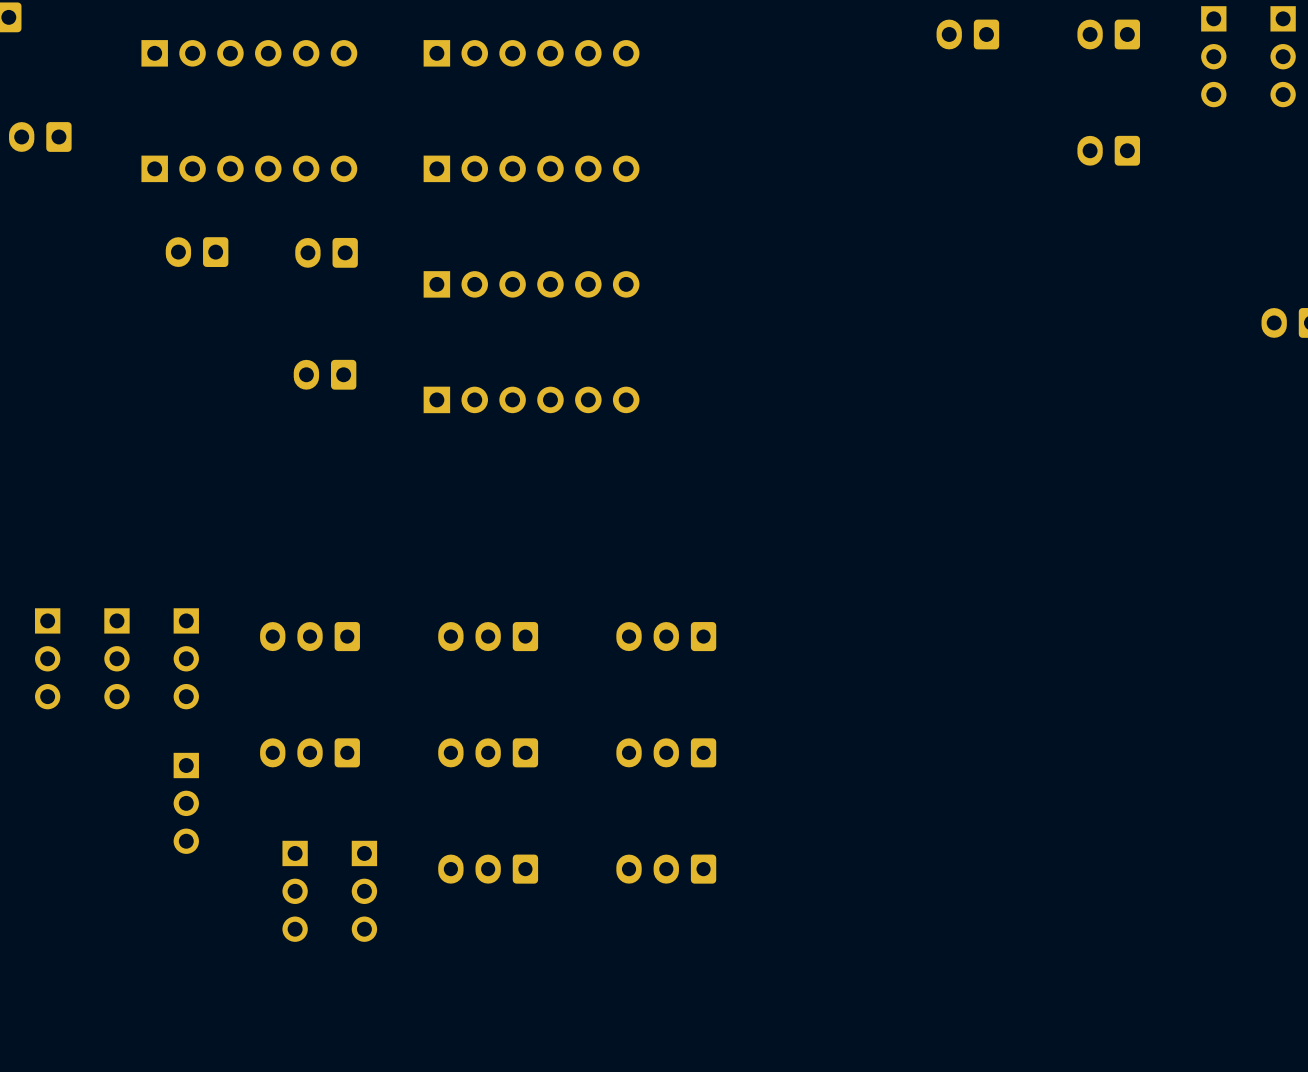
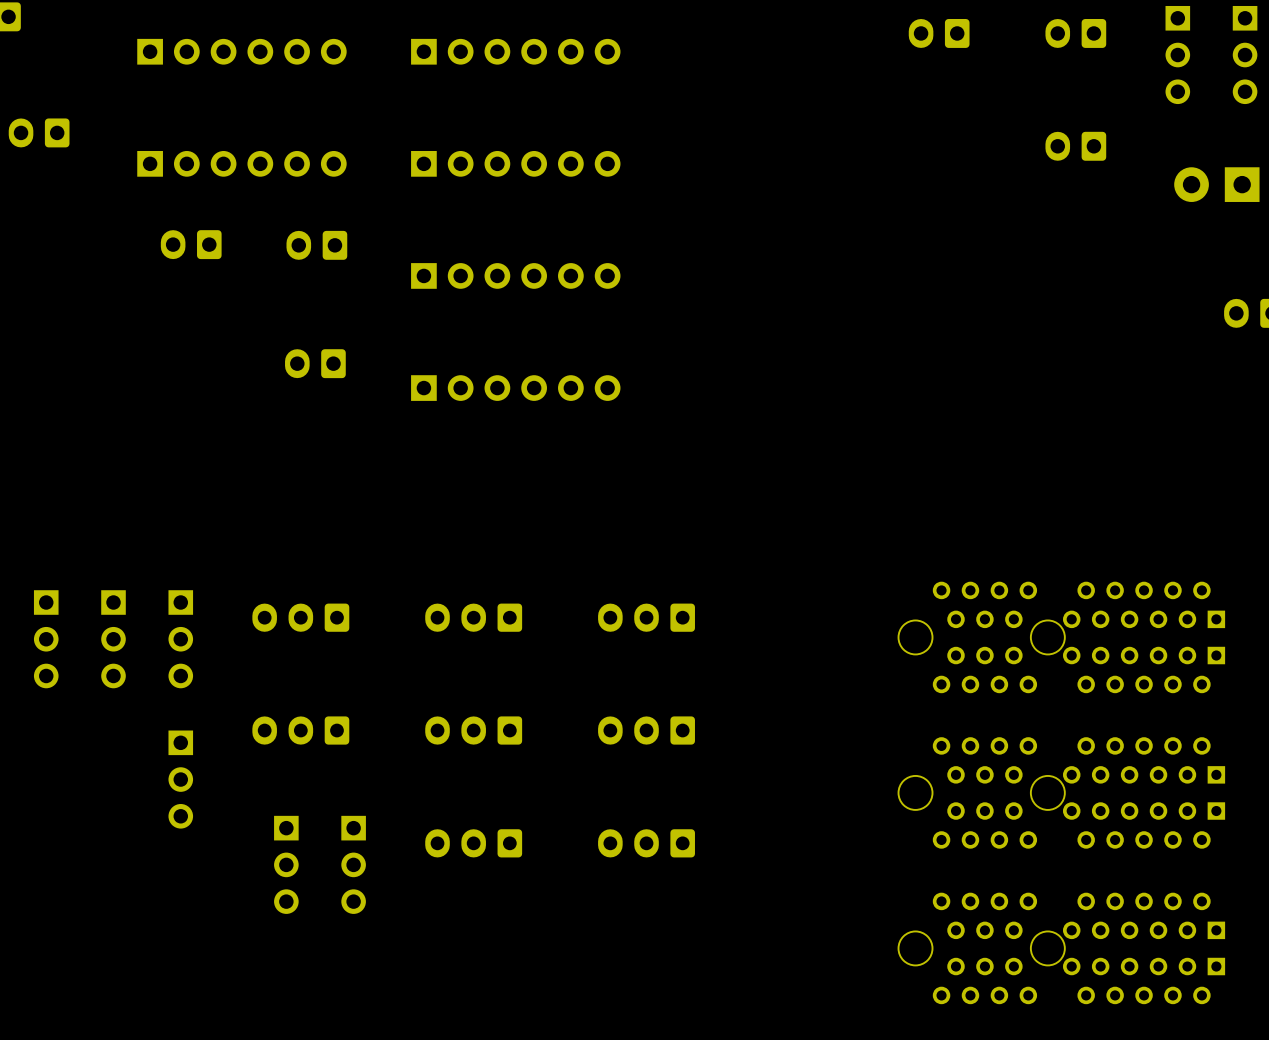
part: none -> (1216, 184)
part: none -> (1061, 637)
part: none -> (1061, 792)
part: none -> (1061, 948)

